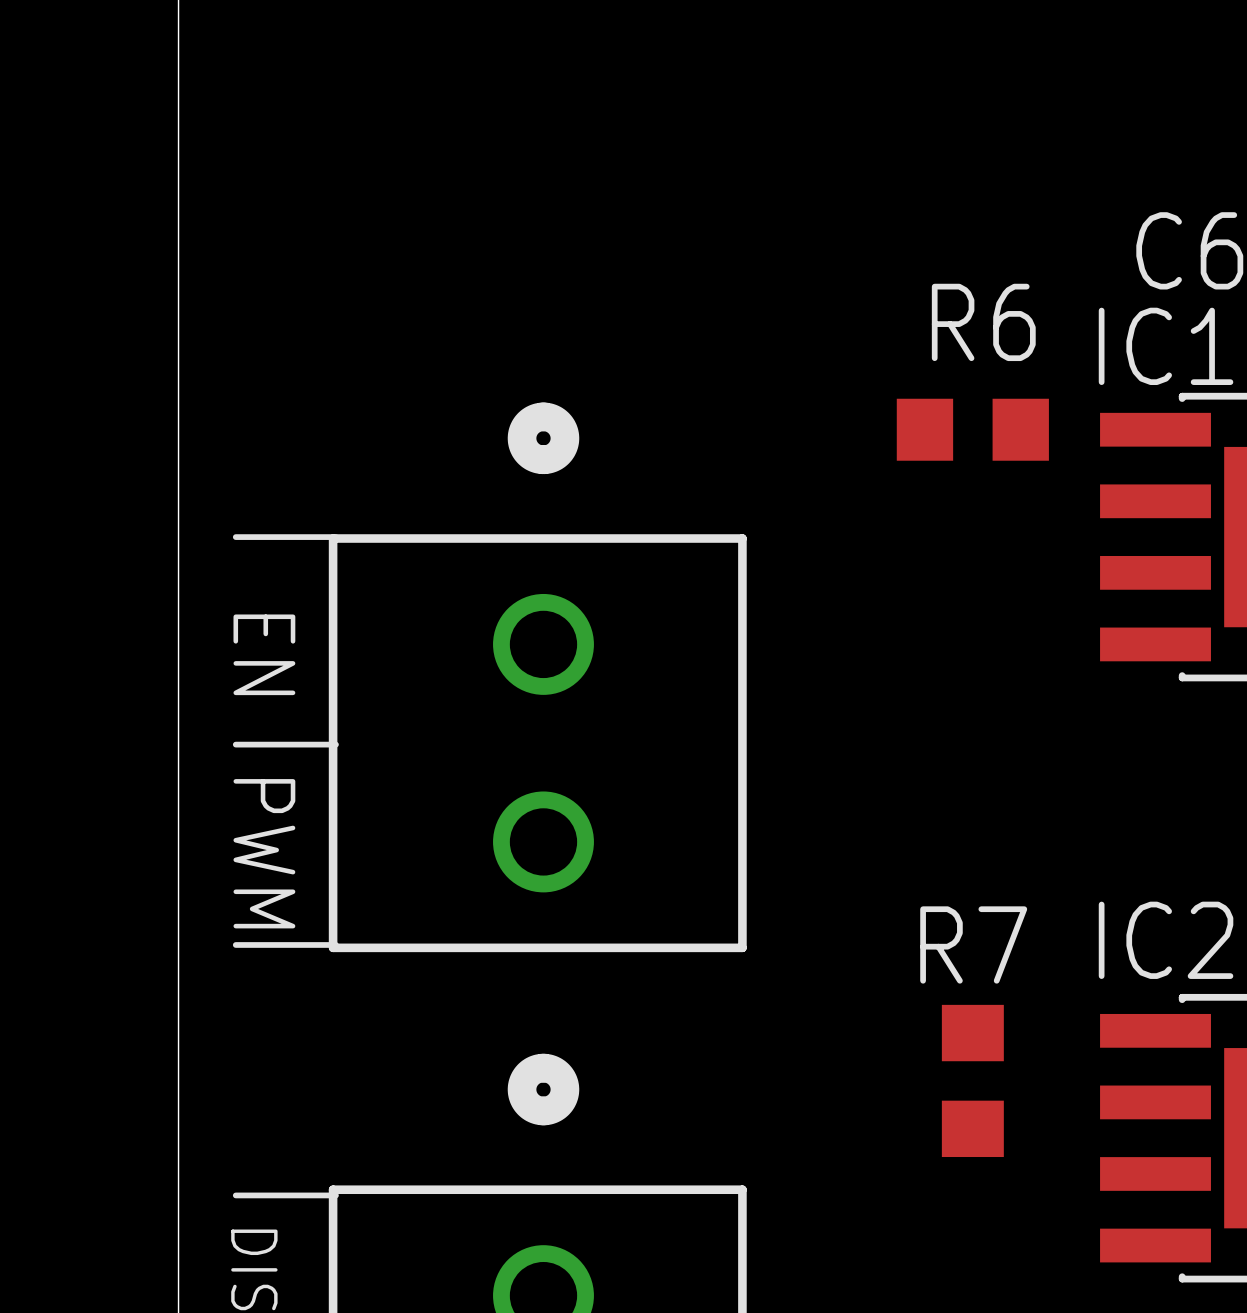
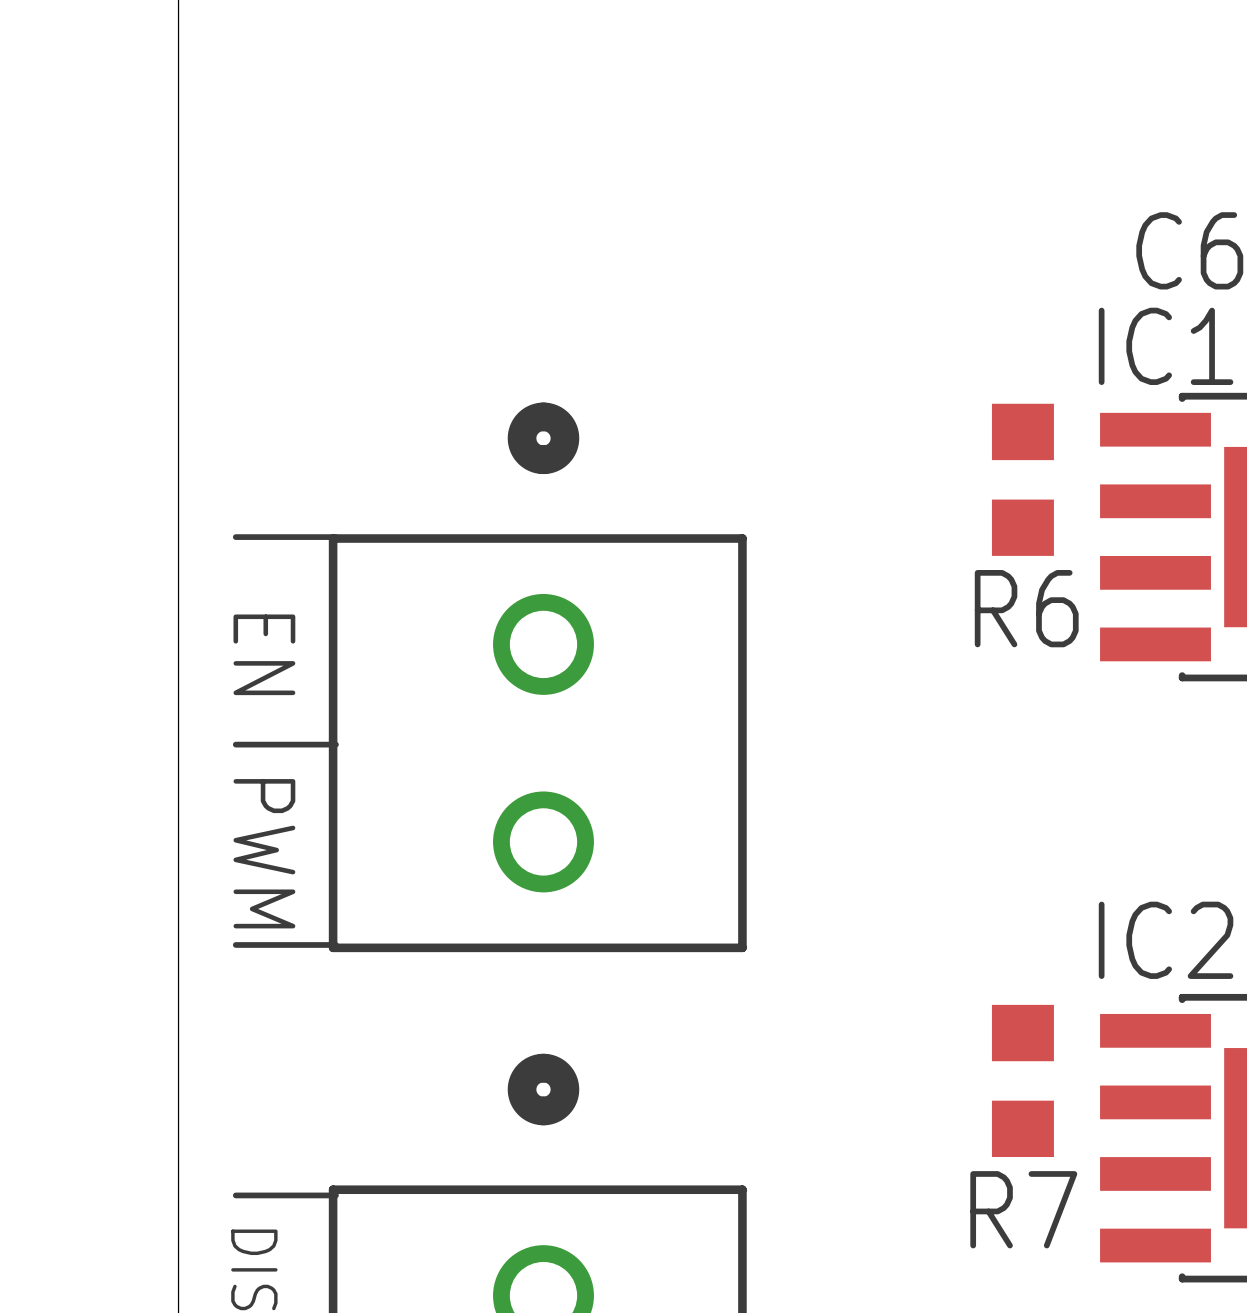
R6 name position: R6 (983, 322) -> R6 (1026, 608)
R6 rotation: 0° (972, 429) -> 90° clockwise (1022, 479)
R7 name position: R7 (973, 944) -> R7 (1023, 1209)
R7 position: (972, 1080) -> (1022, 1080)

